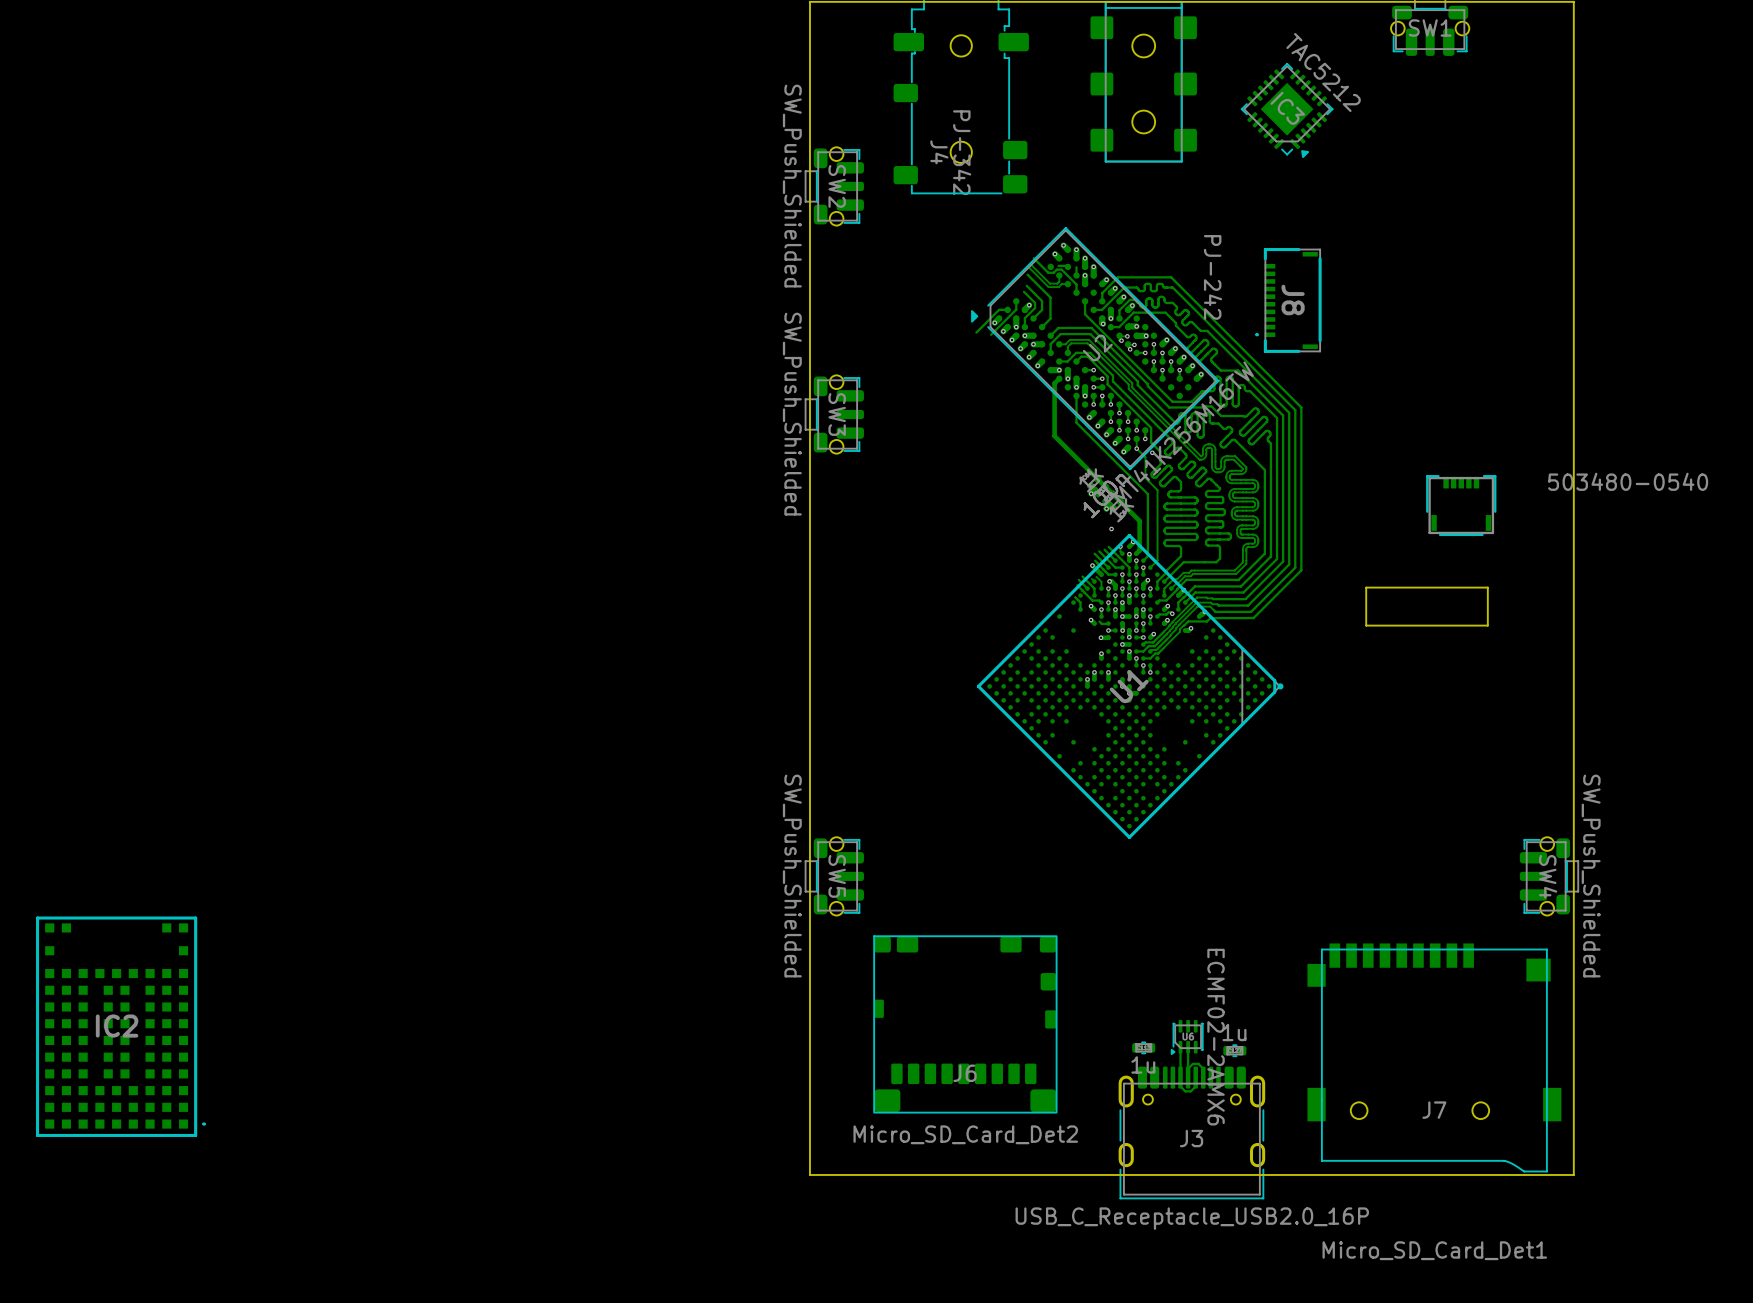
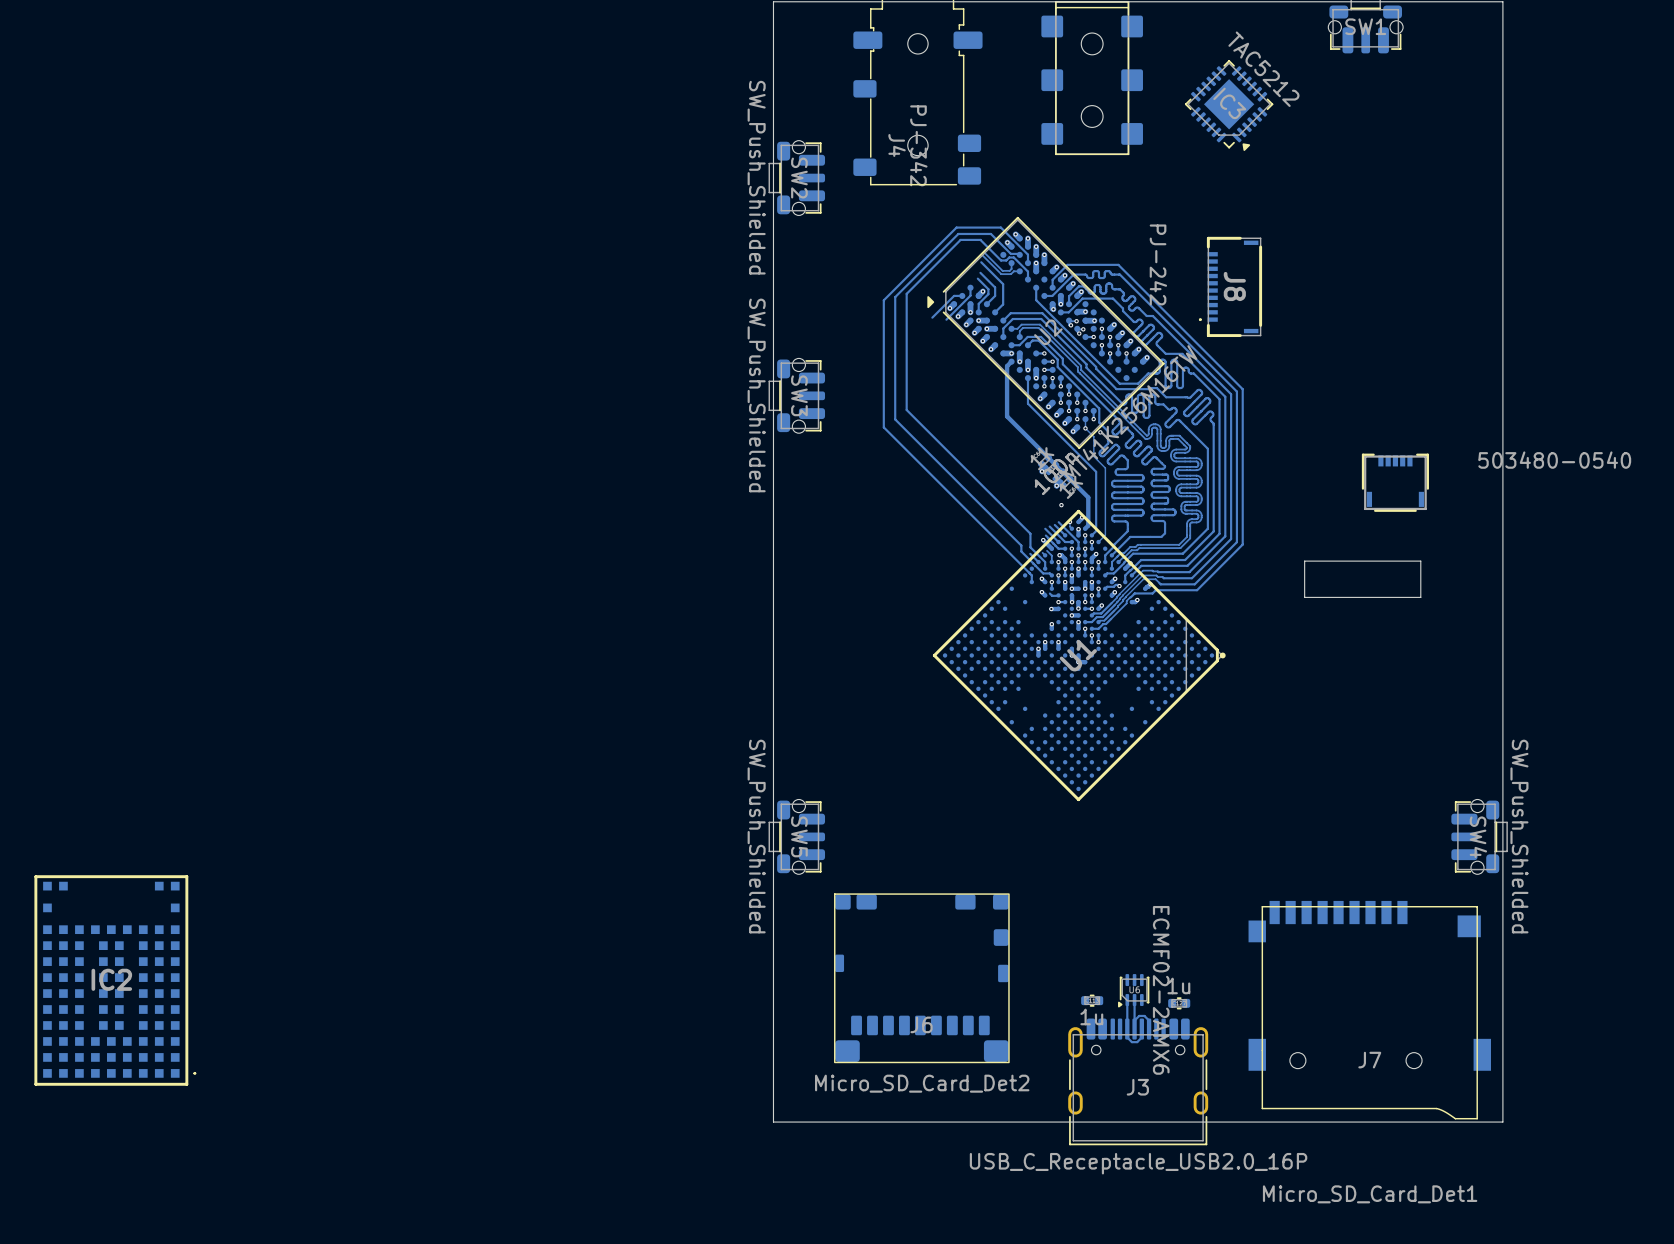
track: none -> (987, 246) (980, 239) (960, 239) (906, 293) (906, 410) (1030, 533) (1030, 547) (1033, 550)
track: none -> (1010, 253) (990, 233) (958, 233) (895, 297) (895, 419) (1021, 545) (1021, 551) (1028, 558)
track: none -> (1027, 255) (1000, 227) (956, 227) (883, 300) (883, 427) (1027, 570)

